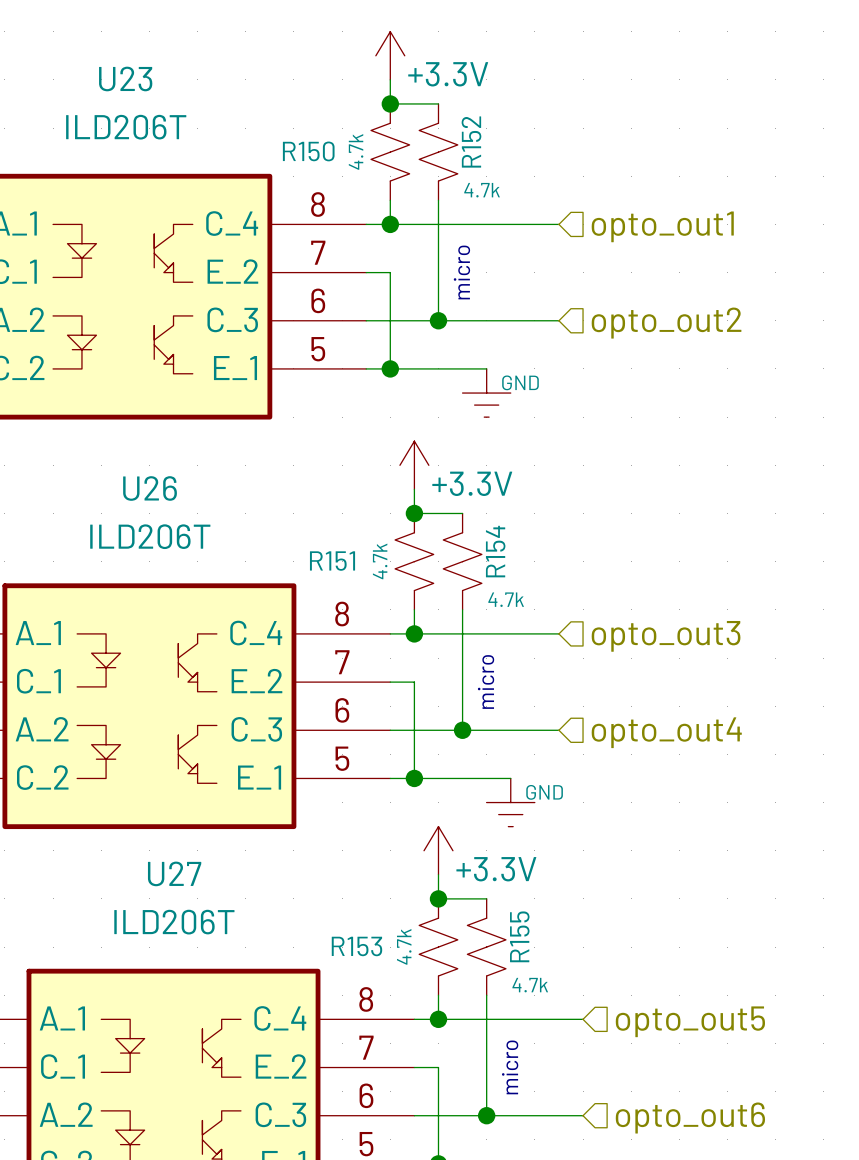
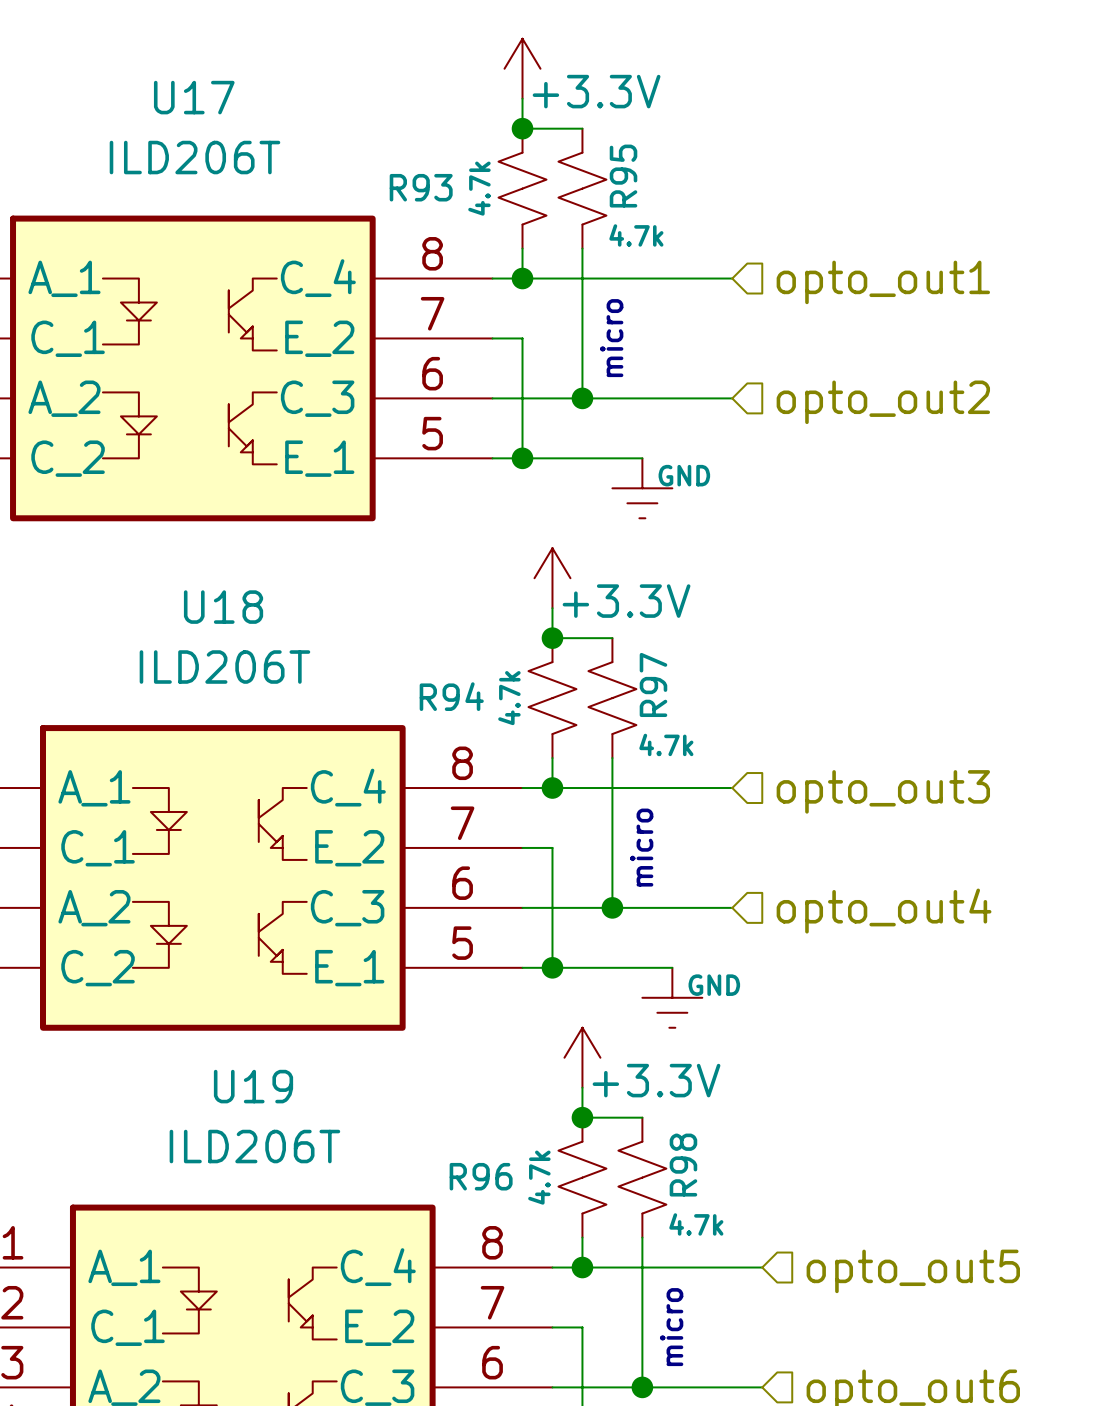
U23 name: U23 (125, 78) -> U17 (194, 97)
R152 name: R152 (471, 142) -> R95 (623, 176)
R150 name: R150 (308, 151) -> R93 (421, 187)
U26 name: U26 (150, 488) -> U18 (223, 607)
R154 name: R154 (495, 551) -> R97 (653, 684)
R151 name: R151 (332, 561) -> R94 (451, 696)
U27 name: U27 (174, 873) -> U19 (253, 1086)
R155 name: R155 (519, 936) -> R98 (683, 1165)
R153 name: R153 (356, 946) -> R96 (481, 1176)

